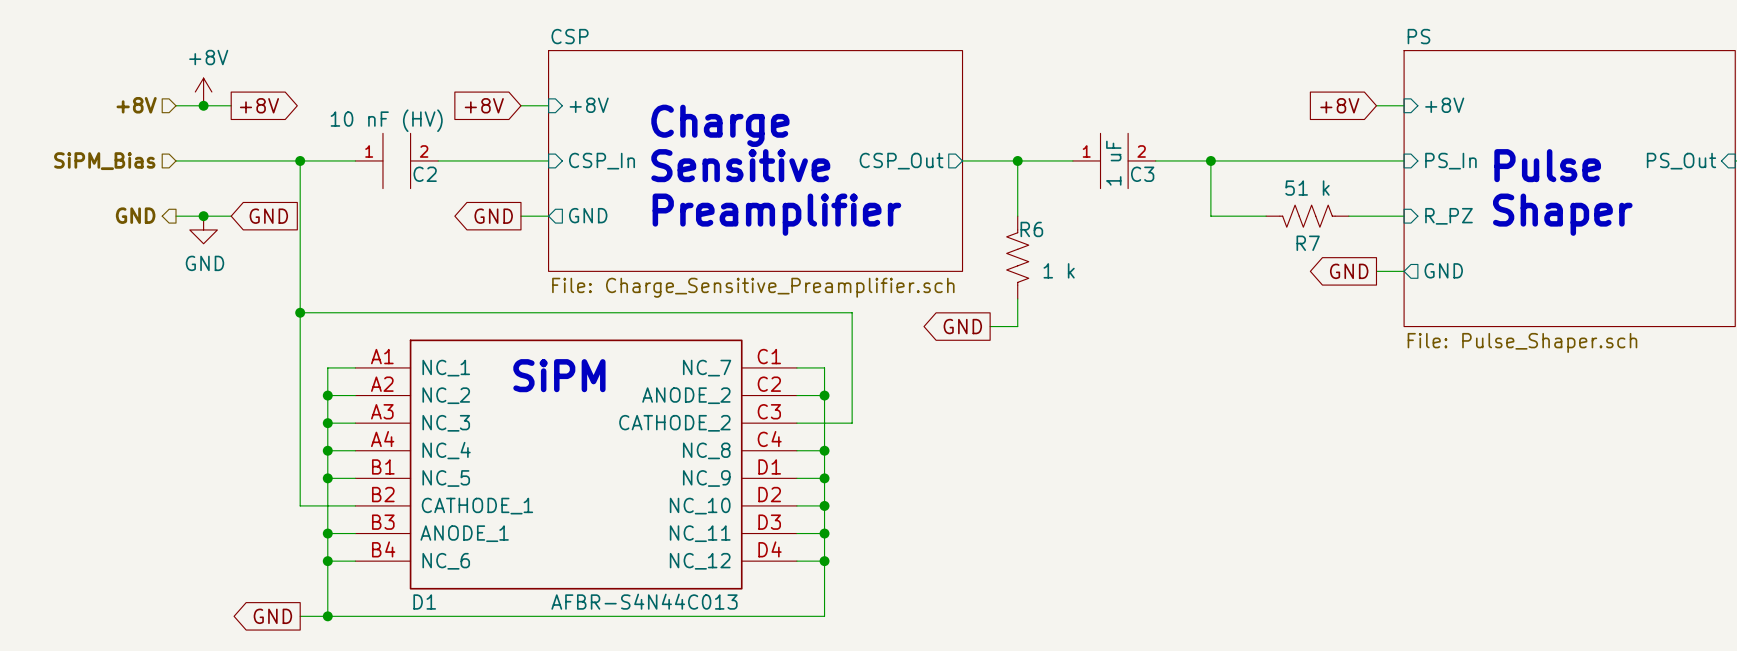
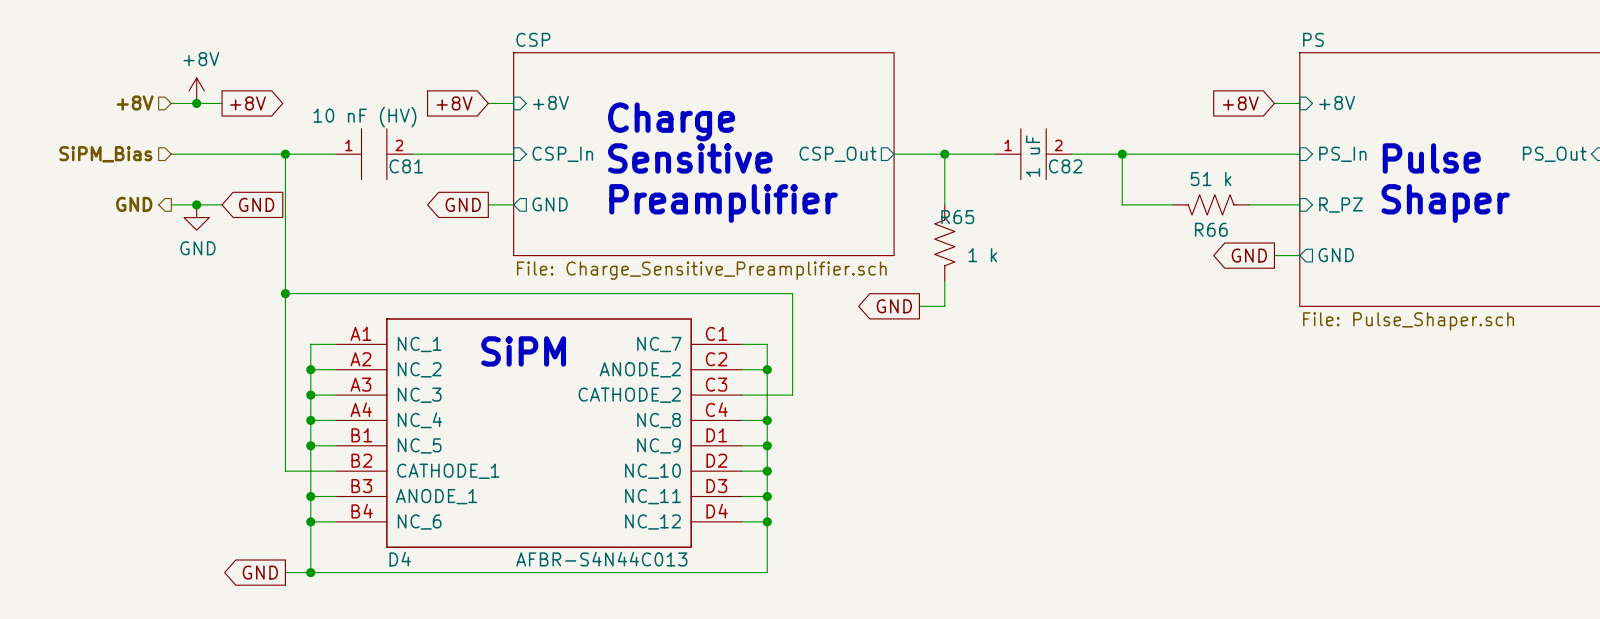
C2 name: C2 (425, 174) -> C81 (406, 166)
C3 name: C3 (1142, 174) -> C82 (1065, 166)
R6 name: R6 (1031, 229) -> R65 (957, 217)
R7 name: R7 (1308, 243) -> R66 (1211, 229)
D1 name: D1 (424, 602) -> D4 (400, 559)

